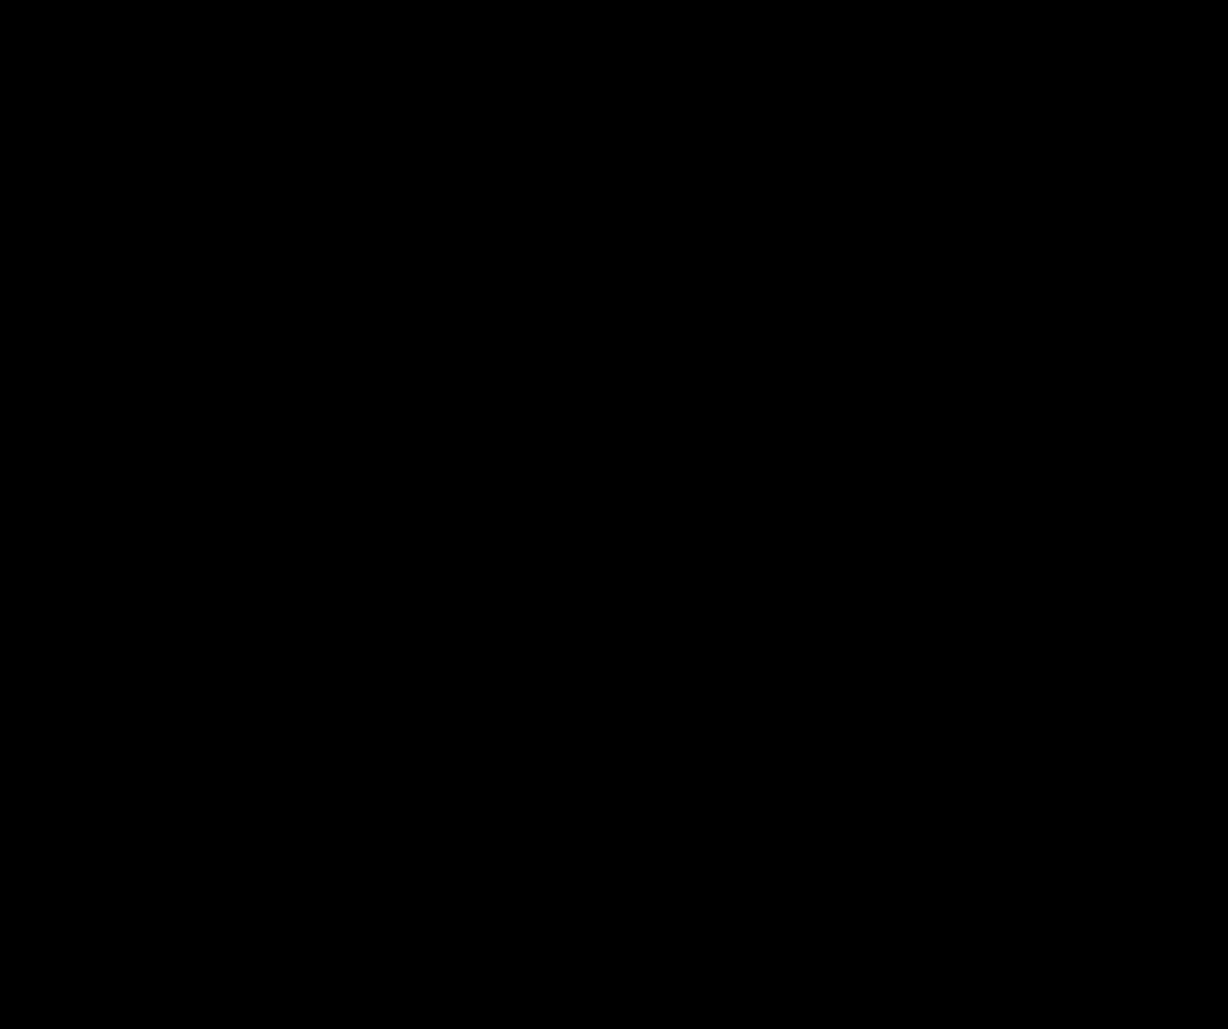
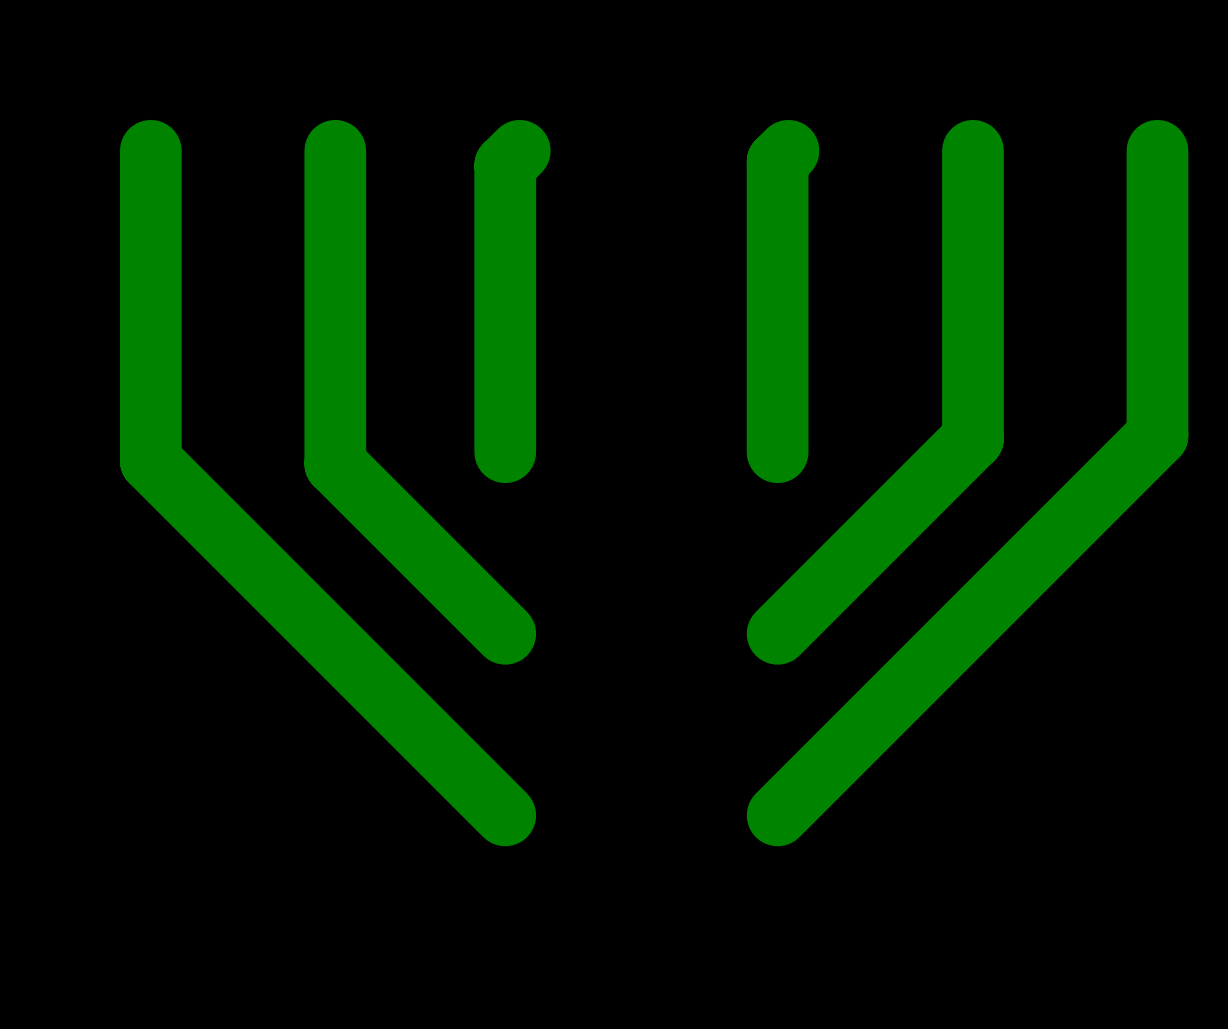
track: none -> (150, 150) (150, 460) (505, 815)
track: none -> (335, 150) (335, 463) (505, 633)
track: none -> (519, 150) (505, 165) (505, 452)
track: none -> (788, 150) (777, 161) (777, 452)
track: none -> (972, 150) (972, 438) (777, 633)
track: none -> (1157, 150) (1157, 435) (777, 815)

